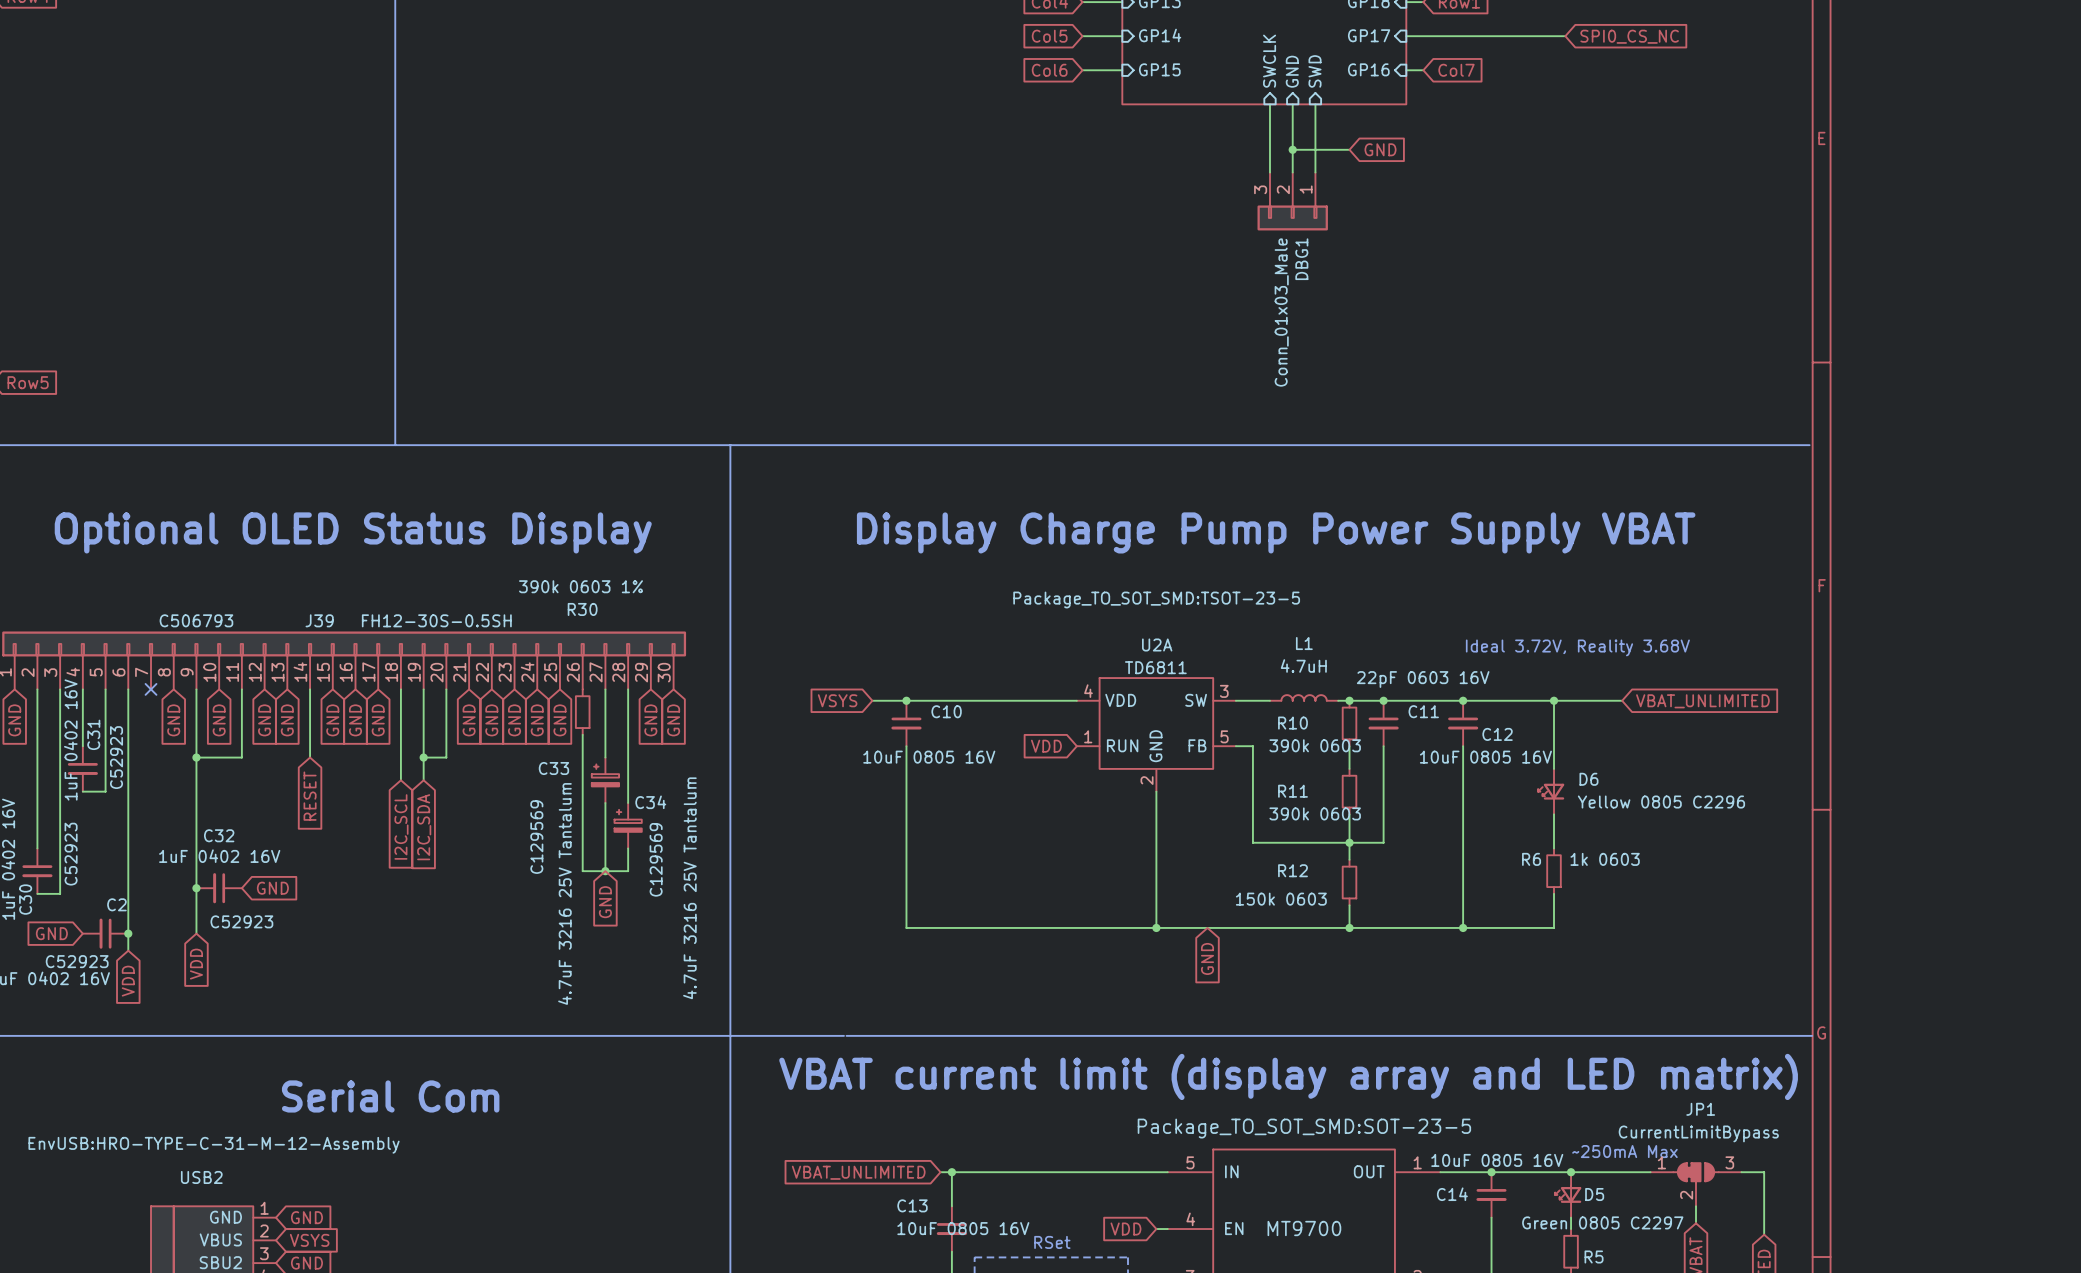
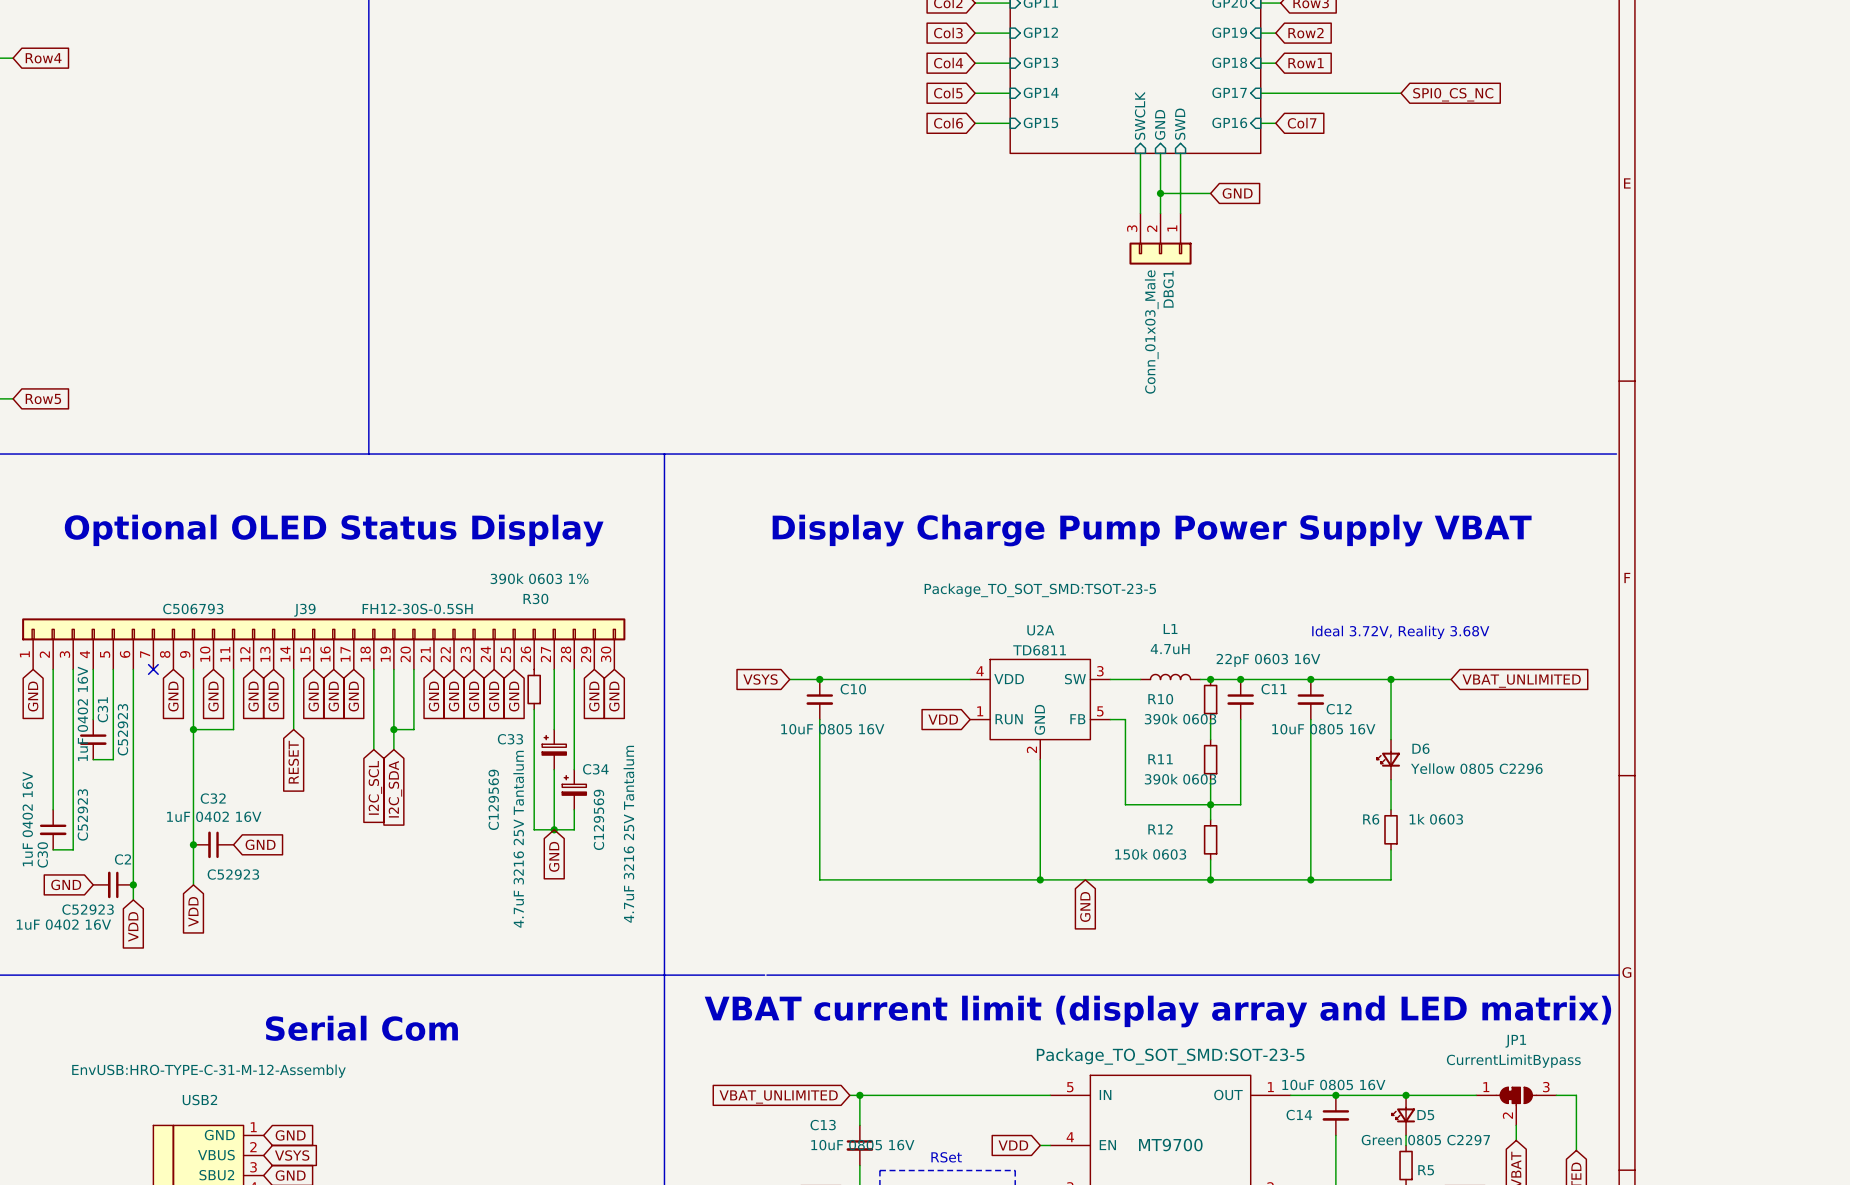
text: ~250mA Max (1624, 1151) -> none

